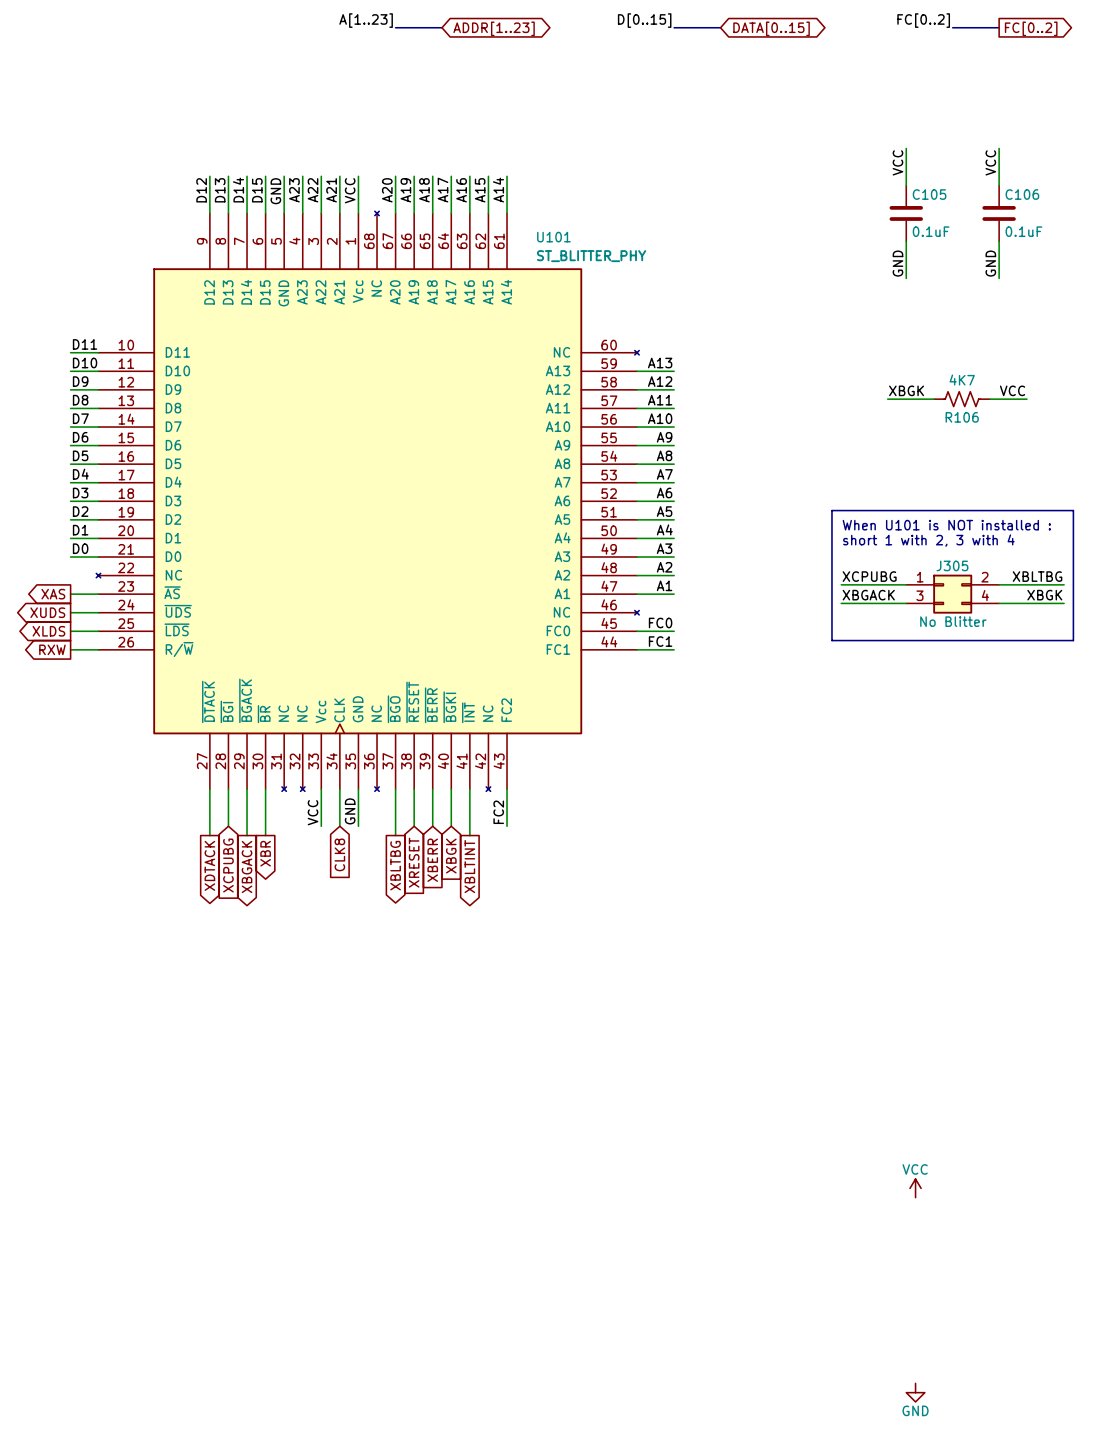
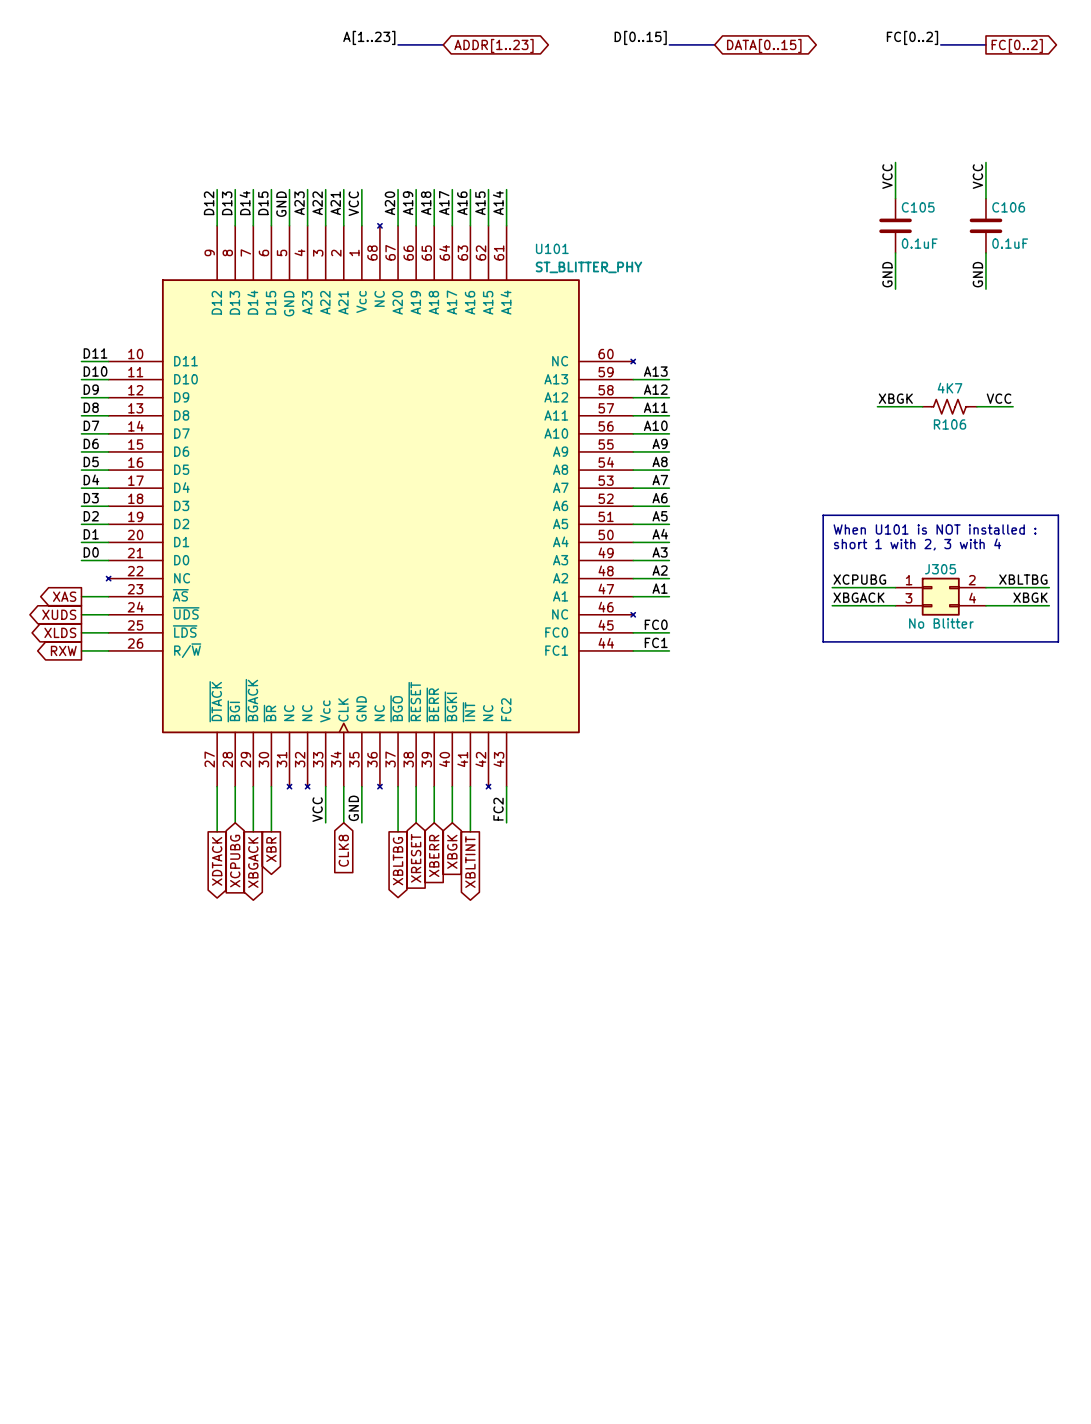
power symbol: VCC (915, 1188) -> none
power symbol: GND (915, 1392) -> none

